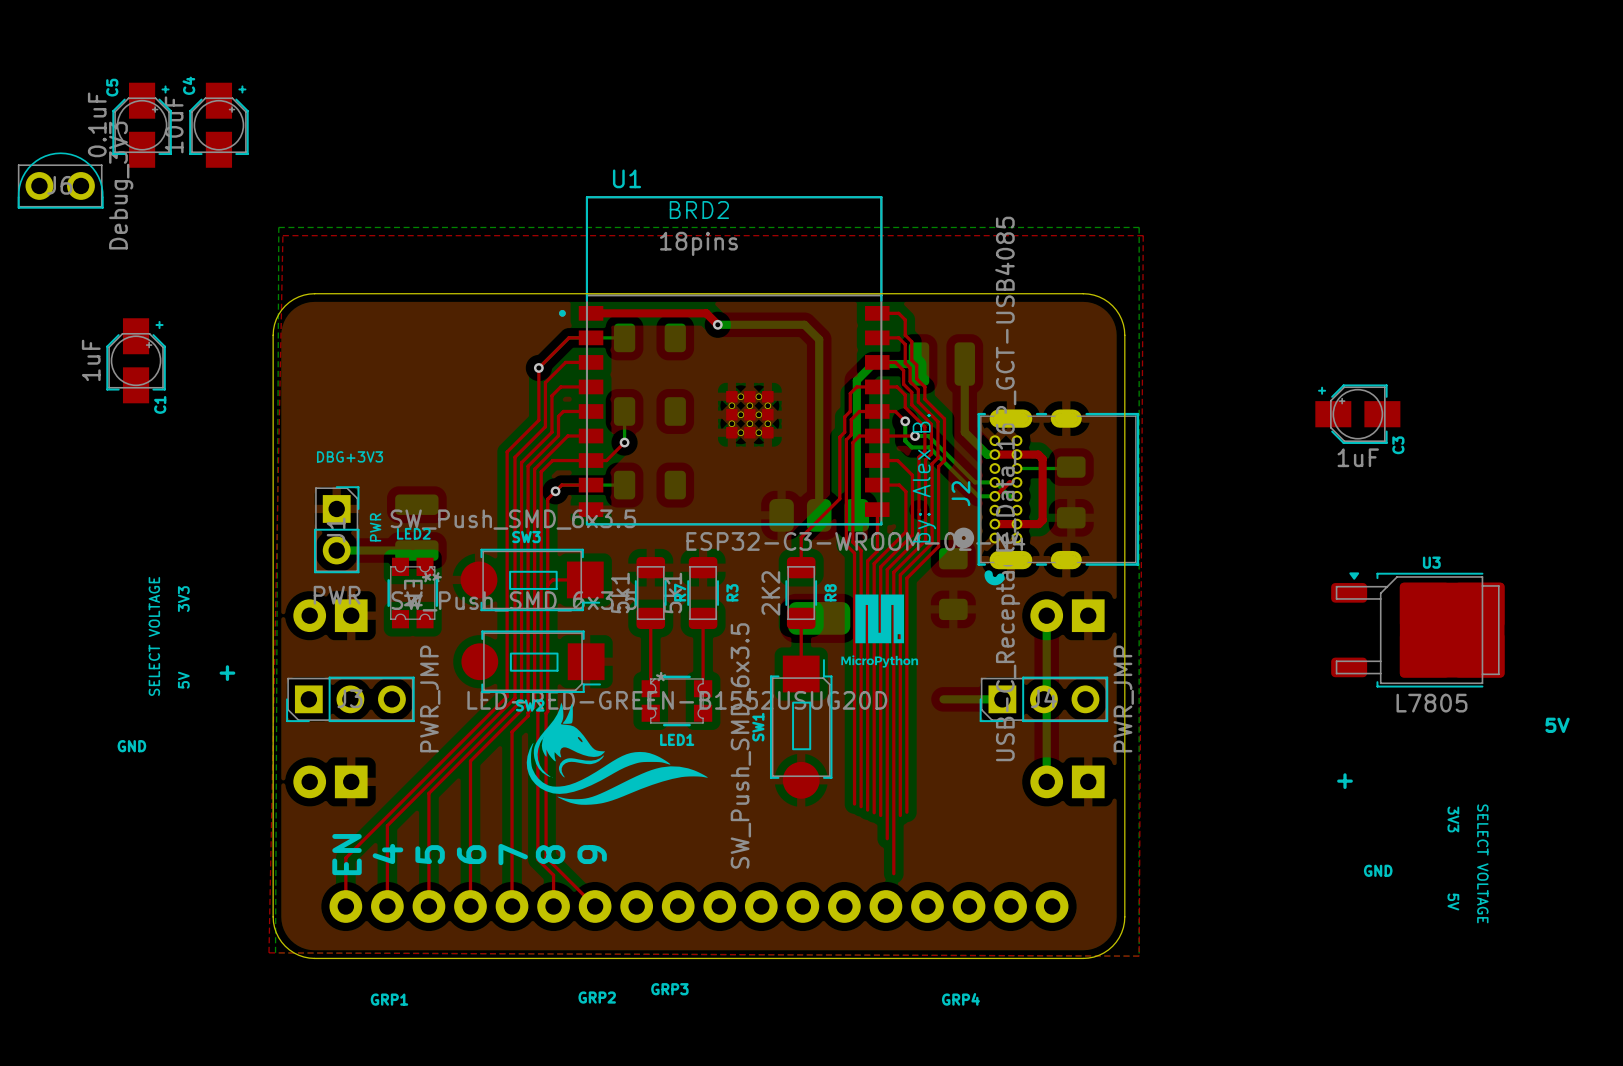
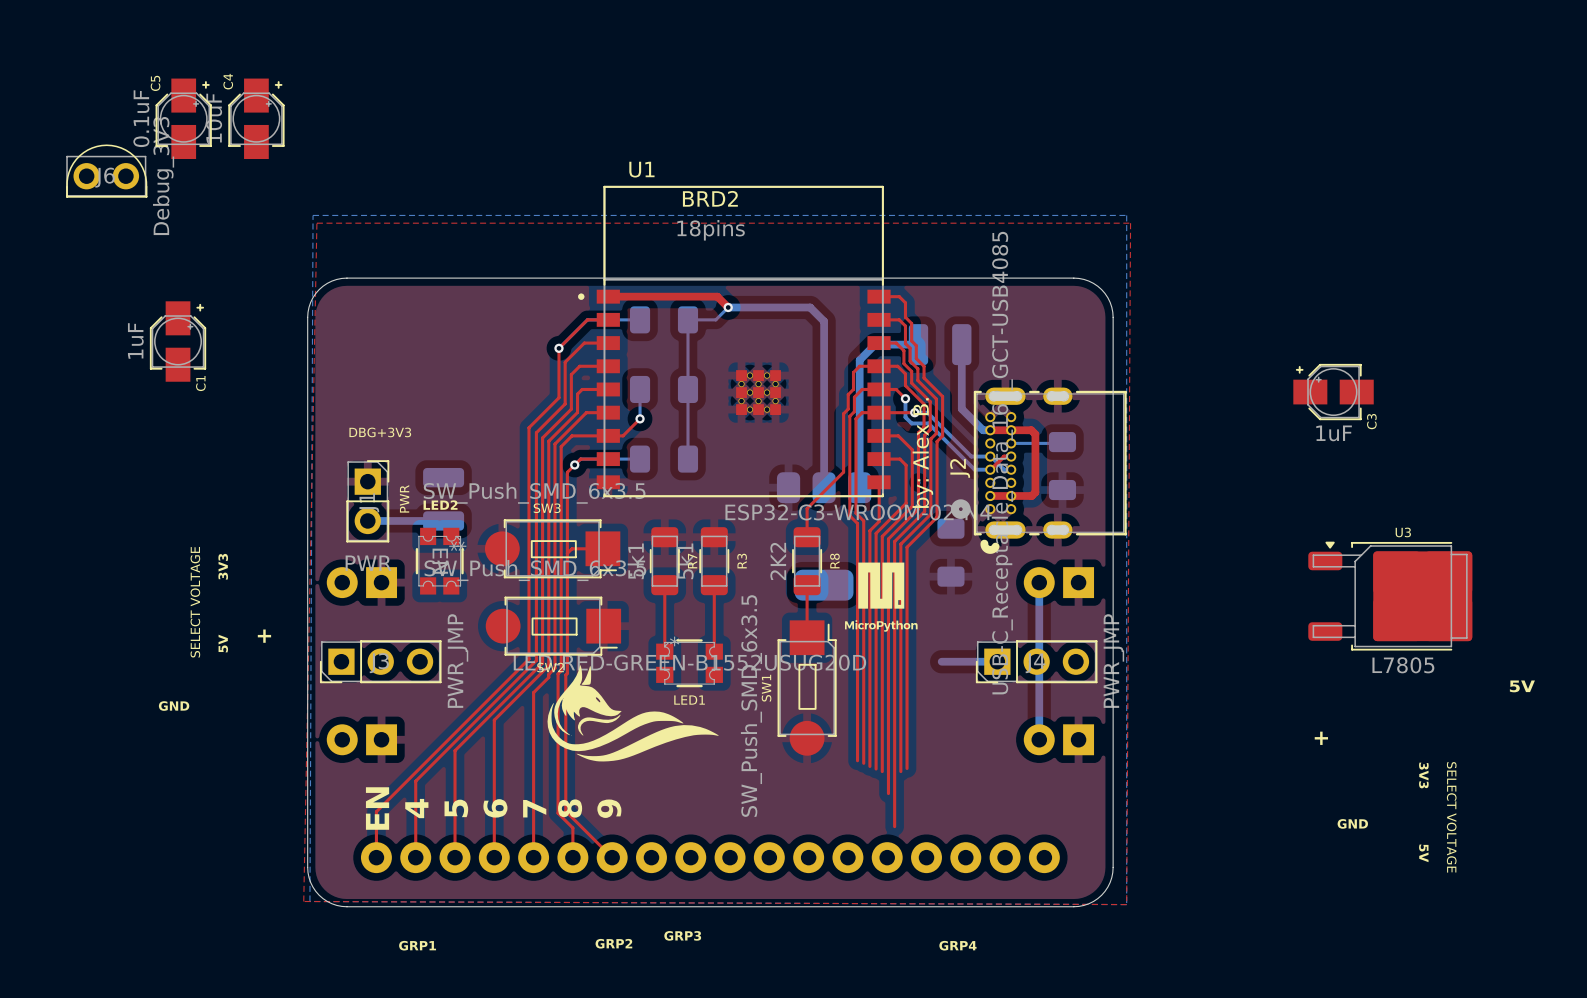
bottom track: none -> (728, 307) (715, 319) (687, 319) (687, 459)

